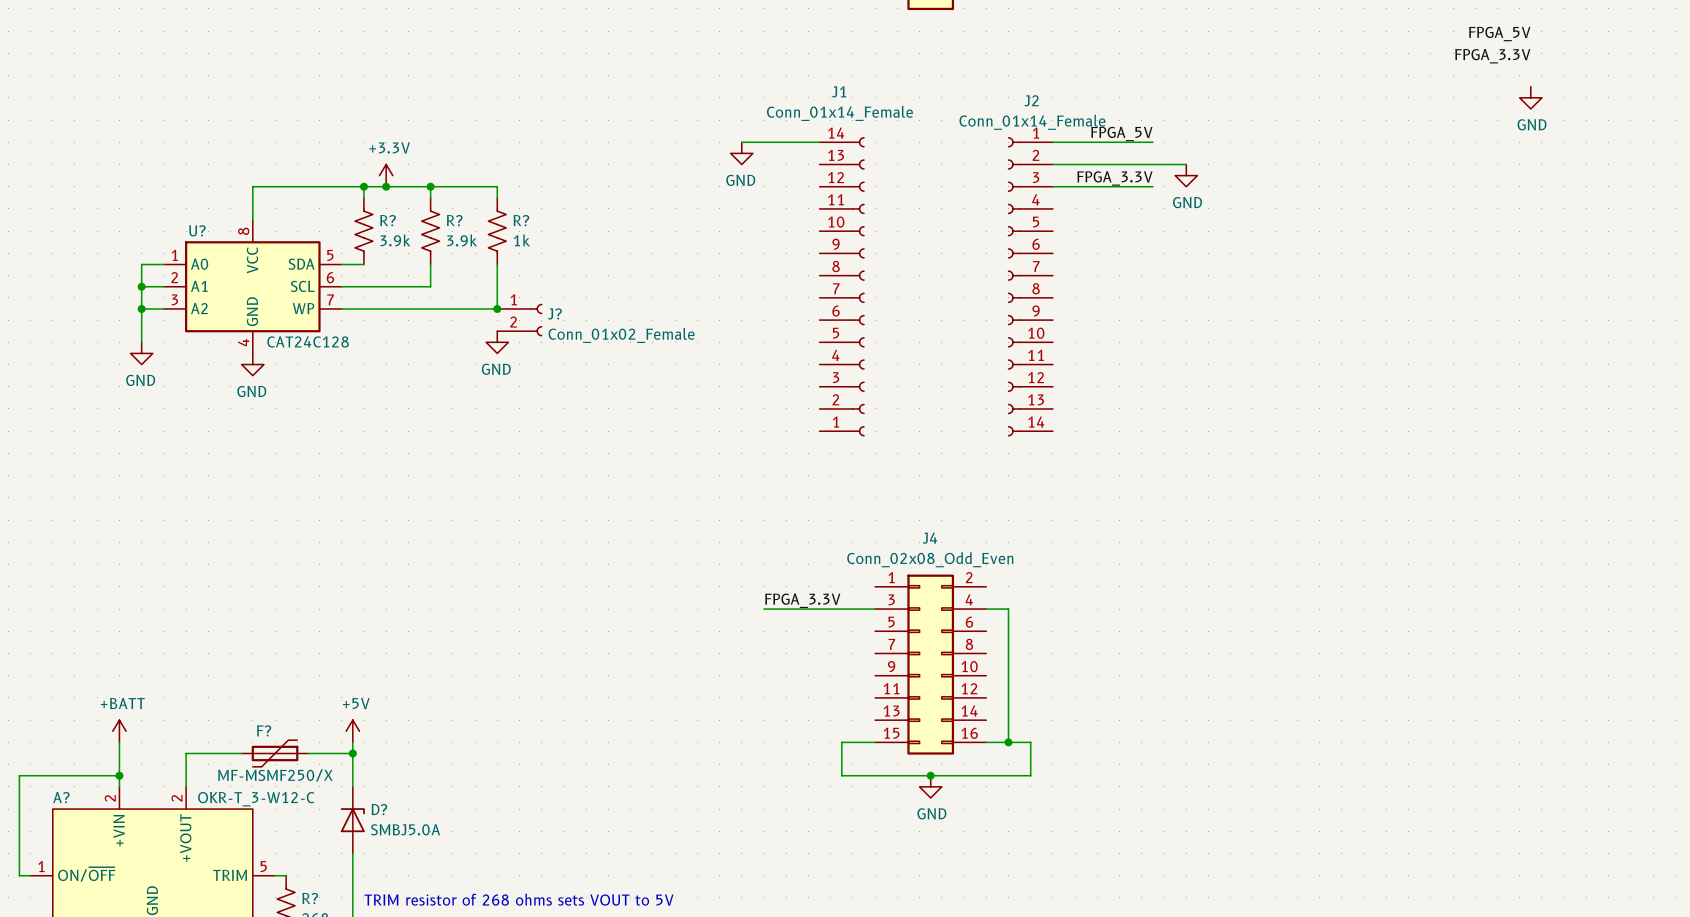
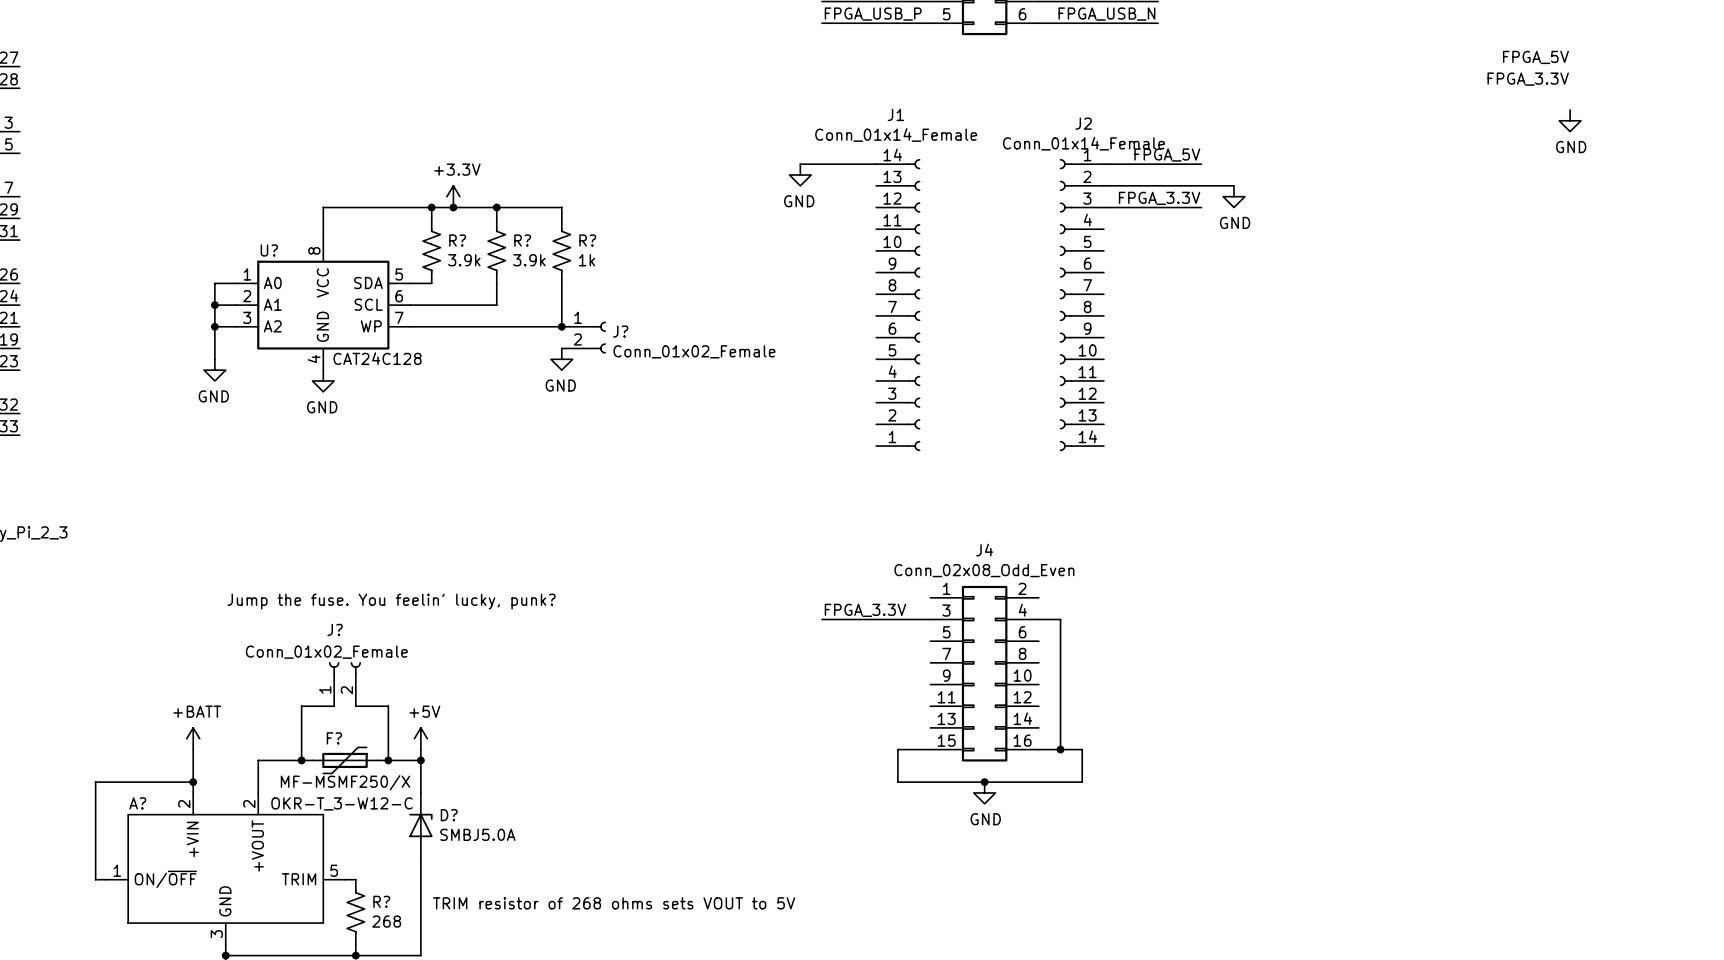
text: none -> Jump the fuse. You feelin' lucky, punk? (391, 601)
J?: none -> Conn_01x02_Female (344, 684)
wire: none -> (334, 706) (301, 706) (301, 760)
wire: none -> (355, 706) (388, 706) (388, 760)
junction: none -> (301, 760)
junction: none -> (388, 760)

